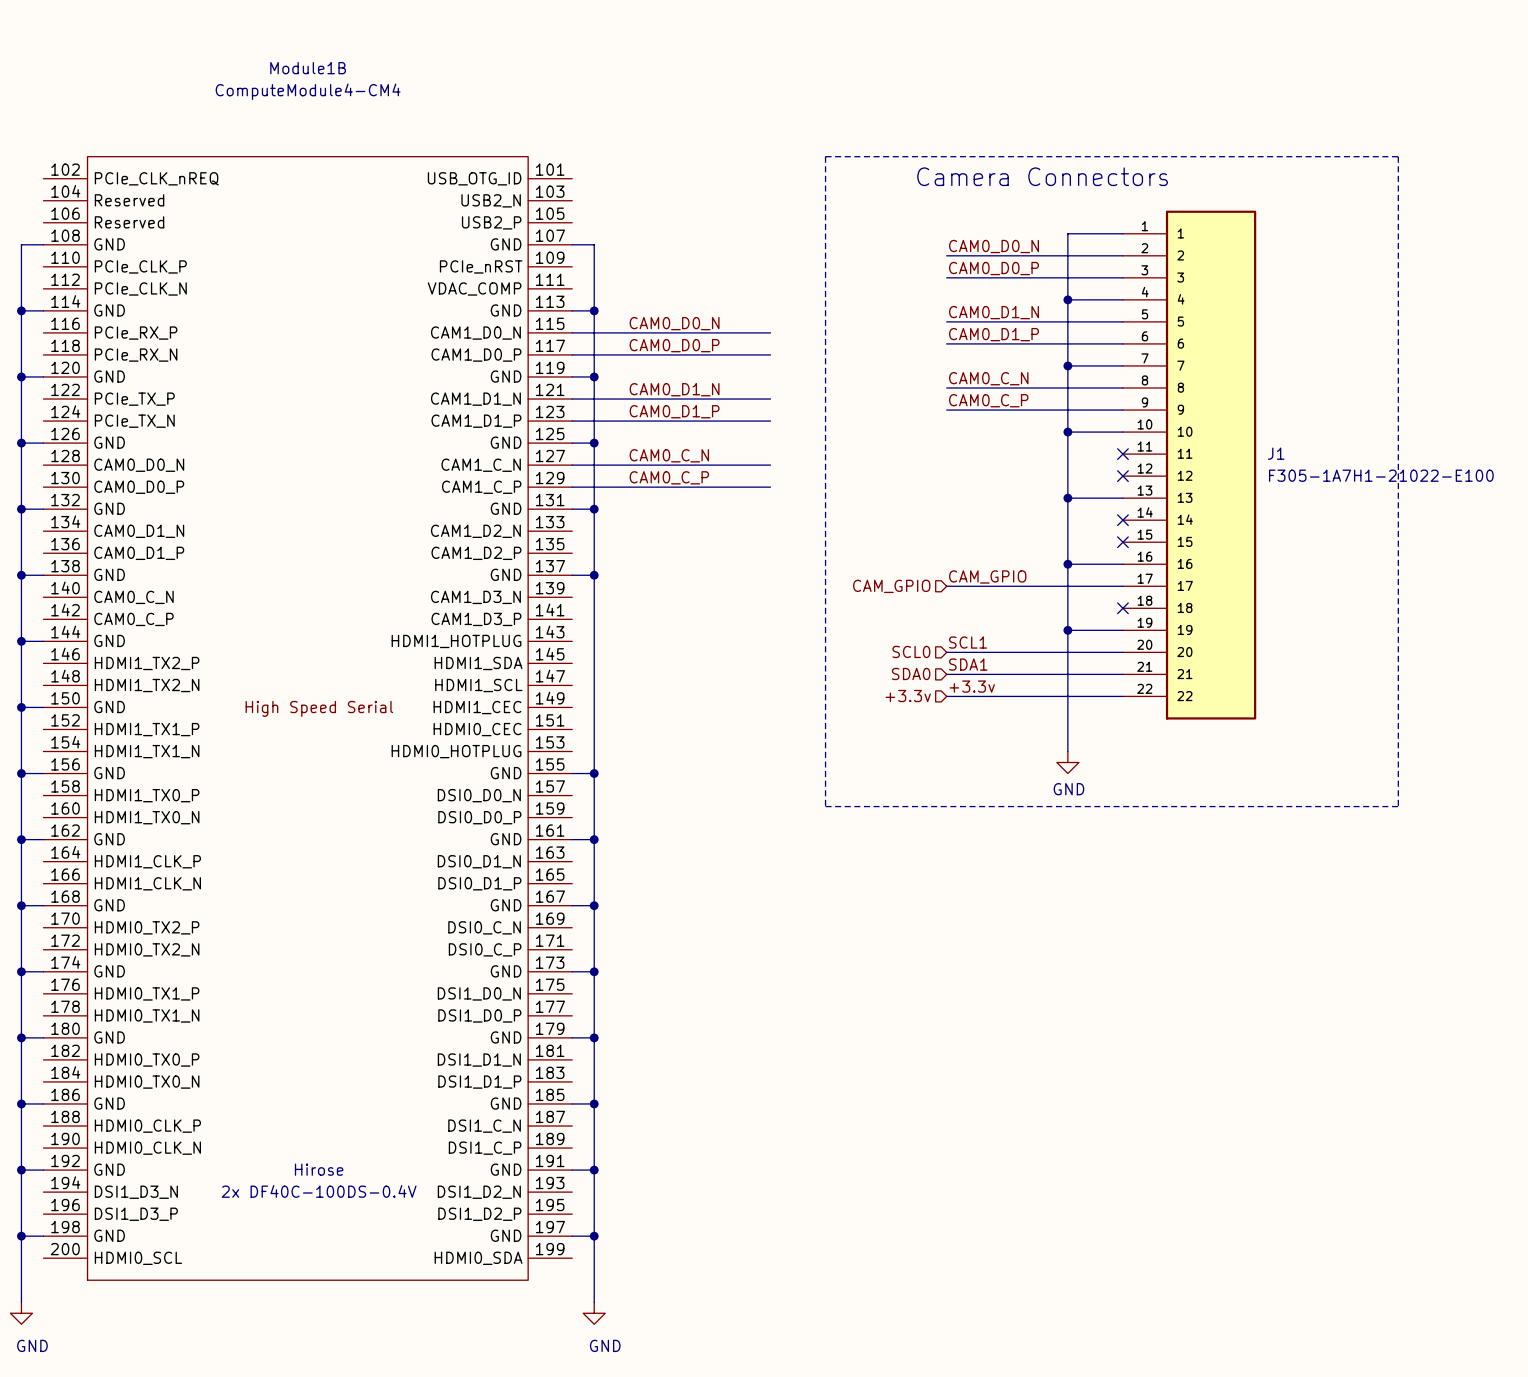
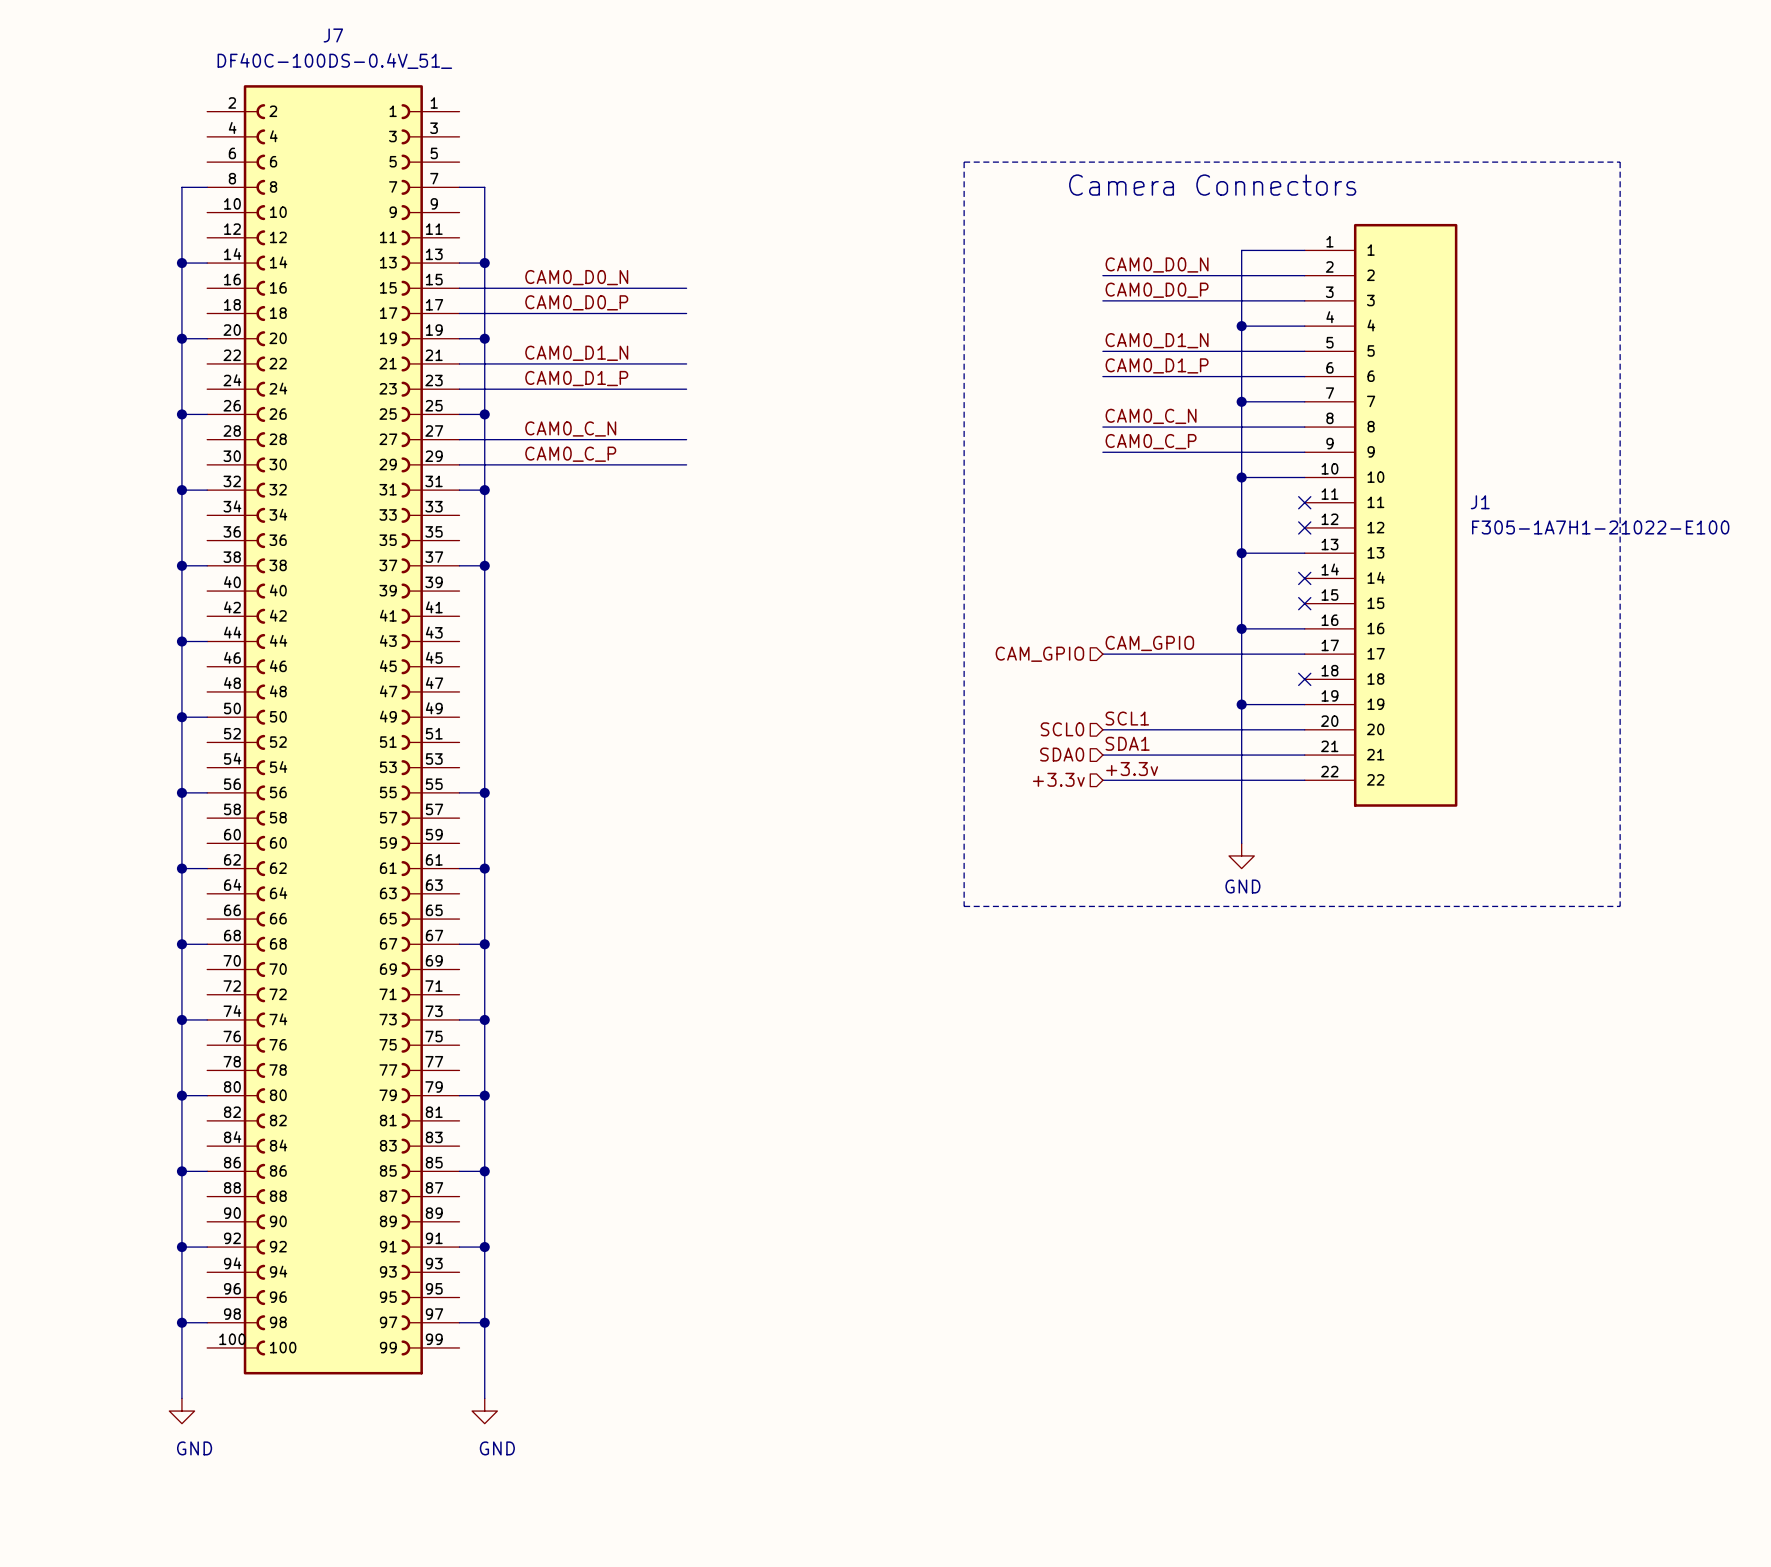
wire: (43, 244) (21, 244) (21, 1302) -> (207, 187) (181, 187) (181, 1398)
junction: none -> (181, 263)
junction: none -> (484, 263)
wire: (572, 244) (594, 244) (594, 1302) -> (459, 187) (484, 187) (484, 1398)
wire: none -> (459, 288) (686, 288)
wire: none -> (459, 313) (686, 313)
wire: (21, 310) (43, 310) -> (181, 263) (207, 263)
junction: (21, 310) -> none
junction: none -> (181, 338)
junction: none -> (484, 338)
wire: (572, 310) (594, 310) -> (459, 263) (484, 263)
junction: (594, 310) -> none
label position: CAM0_D0_N (674, 323) -> CAM0_D0_N (576, 277)
wire: (583, 332) (770, 332) -> (459, 363) (673, 363)
label position: CAM0_D0_P (674, 345) -> CAM0_D0_P (576, 302)
wire: (583, 354) (770, 354) -> (459, 389) (673, 389)
wire: (21, 376) (43, 376) -> (181, 338) (207, 338)
junction: (21, 376) -> none
junction: none -> (181, 414)
junction: none -> (484, 414)
wire: (572, 376) (594, 376) -> (459, 338) (484, 338)
junction: (594, 376) -> none
label position: CAM0_D1_N (674, 389) -> CAM0_D1_N (576, 353)
wire: (583, 399) (770, 399) -> (459, 439) (673, 439)
label position: CAM0_D1_P (674, 411) -> CAM0_D1_P (576, 378)
wire: (583, 421) (770, 421) -> (459, 464) (673, 464)
wire: (21, 443) (43, 443) -> (181, 414) (207, 414)
junction: (21, 443) -> none
junction: none -> (181, 490)
junction: none -> (484, 490)
wire: (572, 443) (594, 443) -> (459, 414) (484, 414)
junction: (594, 443) -> none
label position: CAM0_C_N (669, 455) -> CAM0_C_N (570, 428)
wire: (572, 465) (770, 465) -> none
label position: CAM0_C_P (669, 477) -> CAM0_C_P (570, 454)
wire: (572, 487) (770, 487) -> none
wire: (21, 509) (43, 509) -> (181, 490) (207, 490)
junction: (21, 509) -> none
junction: none -> (181, 565)
junction: none -> (484, 565)
wire: (572, 509) (594, 509) -> (459, 490) (484, 490)
junction: (594, 509) -> none
wire: (21, 575) (43, 575) -> (181, 565) (207, 565)
junction: (21, 575) -> none
junction: none -> (181, 641)
wire: (572, 575) (594, 575) -> (459, 565) (484, 565)
junction: (594, 575) -> none
wire: (21, 641) (43, 641) -> (181, 641) (207, 641)
junction: (21, 641) -> none
junction: none -> (181, 717)
J7: none -> DF40C-100DS-0.4V_51_ (333, 729)
wire: (21, 707) (43, 707) -> (181, 717) (207, 717)
junction: (21, 707) -> none
junction: none -> (181, 792)
junction: none -> (484, 792)
Module1B: ComputeModule4-CM4 (307, 718) -> none
wire: (21, 773) (43, 773) -> (181, 792) (207, 792)
junction: (21, 773) -> none
junction: none -> (181, 868)
junction: none -> (484, 868)
wire: (572, 773) (594, 773) -> (459, 792) (484, 792)
junction: (594, 773) -> none
wire: (21, 839) (43, 839) -> (181, 868) (207, 868)
junction: (21, 839) -> none
junction: none -> (181, 944)
junction: none -> (484, 944)
wire: (572, 839) (594, 839) -> (459, 868) (484, 868)
junction: (594, 839) -> none
wire: (21, 905) (43, 905) -> (181, 944) (207, 944)
junction: (21, 905) -> none
junction: none -> (181, 1019)
junction: none -> (484, 1019)
wire: (572, 905) (594, 905) -> (459, 944) (484, 944)
junction: (594, 905) -> none
wire: (21, 971) (43, 971) -> (181, 1019) (207, 1019)
junction: (21, 971) -> none
junction: none -> (181, 1095)
junction: none -> (484, 1095)
wire: (572, 971) (594, 971) -> (459, 1019) (484, 1019)
junction: (594, 971) -> none
wire: (21, 1037) (43, 1037) -> (181, 1095) (207, 1095)
junction: (21, 1037) -> none
junction: none -> (181, 1171)
junction: none -> (484, 1171)
wire: (572, 1037) (594, 1037) -> (459, 1095) (484, 1095)
junction: (594, 1037) -> none
wire: (21, 1103) (43, 1103) -> (181, 1171) (207, 1171)
junction: (21, 1103) -> none
junction: none -> (181, 1247)
junction: none -> (484, 1247)
wire: (572, 1103) (594, 1103) -> (459, 1171) (484, 1171)
junction: (594, 1103) -> none
wire: (21, 1170) (43, 1170) -> (181, 1247) (207, 1247)
junction: (21, 1170) -> none
junction: none -> (181, 1322)
junction: none -> (484, 1322)
wire: (572, 1170) (594, 1170) -> (459, 1247) (484, 1247)
junction: (594, 1170) -> none
wire: (21, 1236) (43, 1236) -> (181, 1322) (207, 1322)
junction: (21, 1236) -> none
wire: (572, 1236) (594, 1236) -> (459, 1322) (484, 1322)
junction: (594, 1236) -> none
power symbol: none -> GND (484, 1411)
power symbol position: GND (21, 1313) -> GND (181, 1411)
power symbol: GND (594, 1313) -> none

